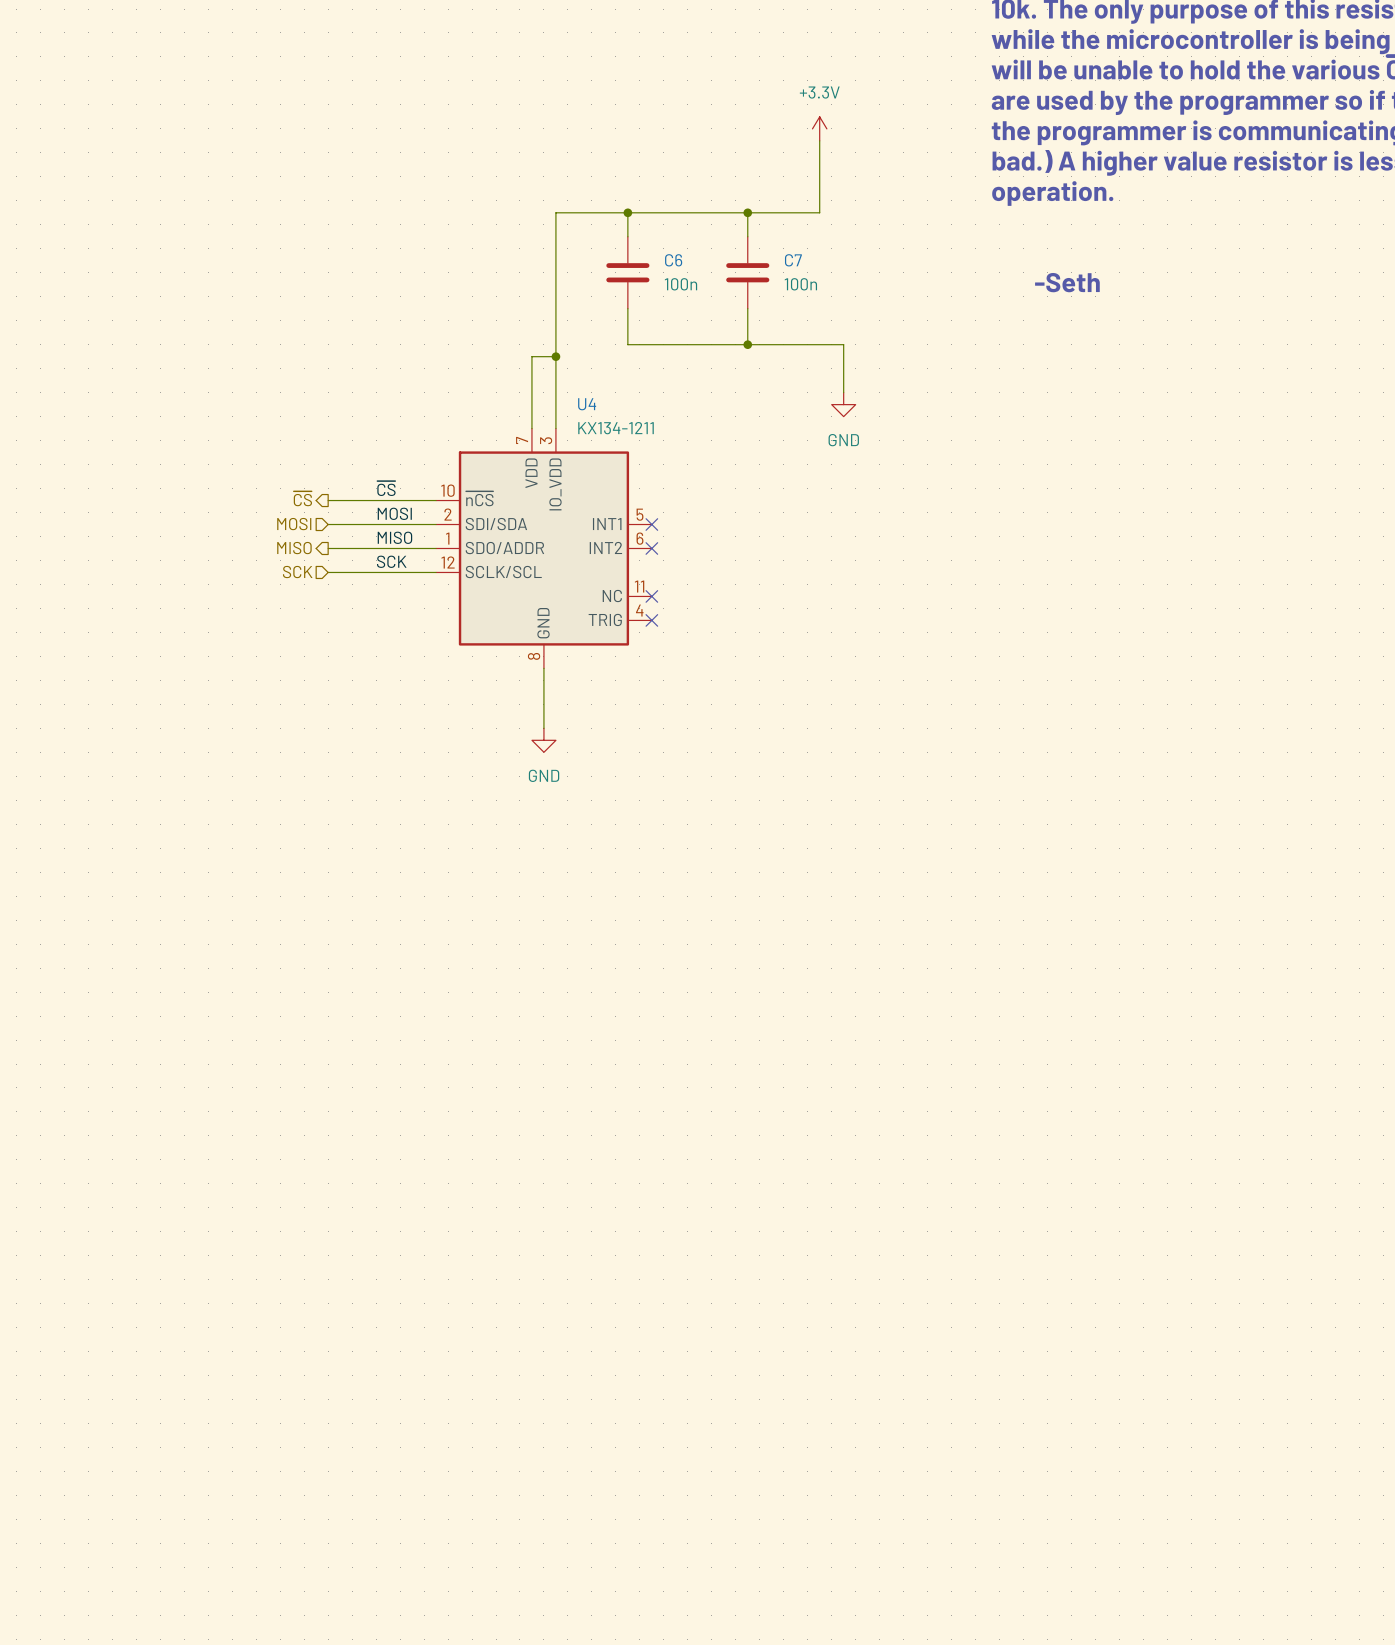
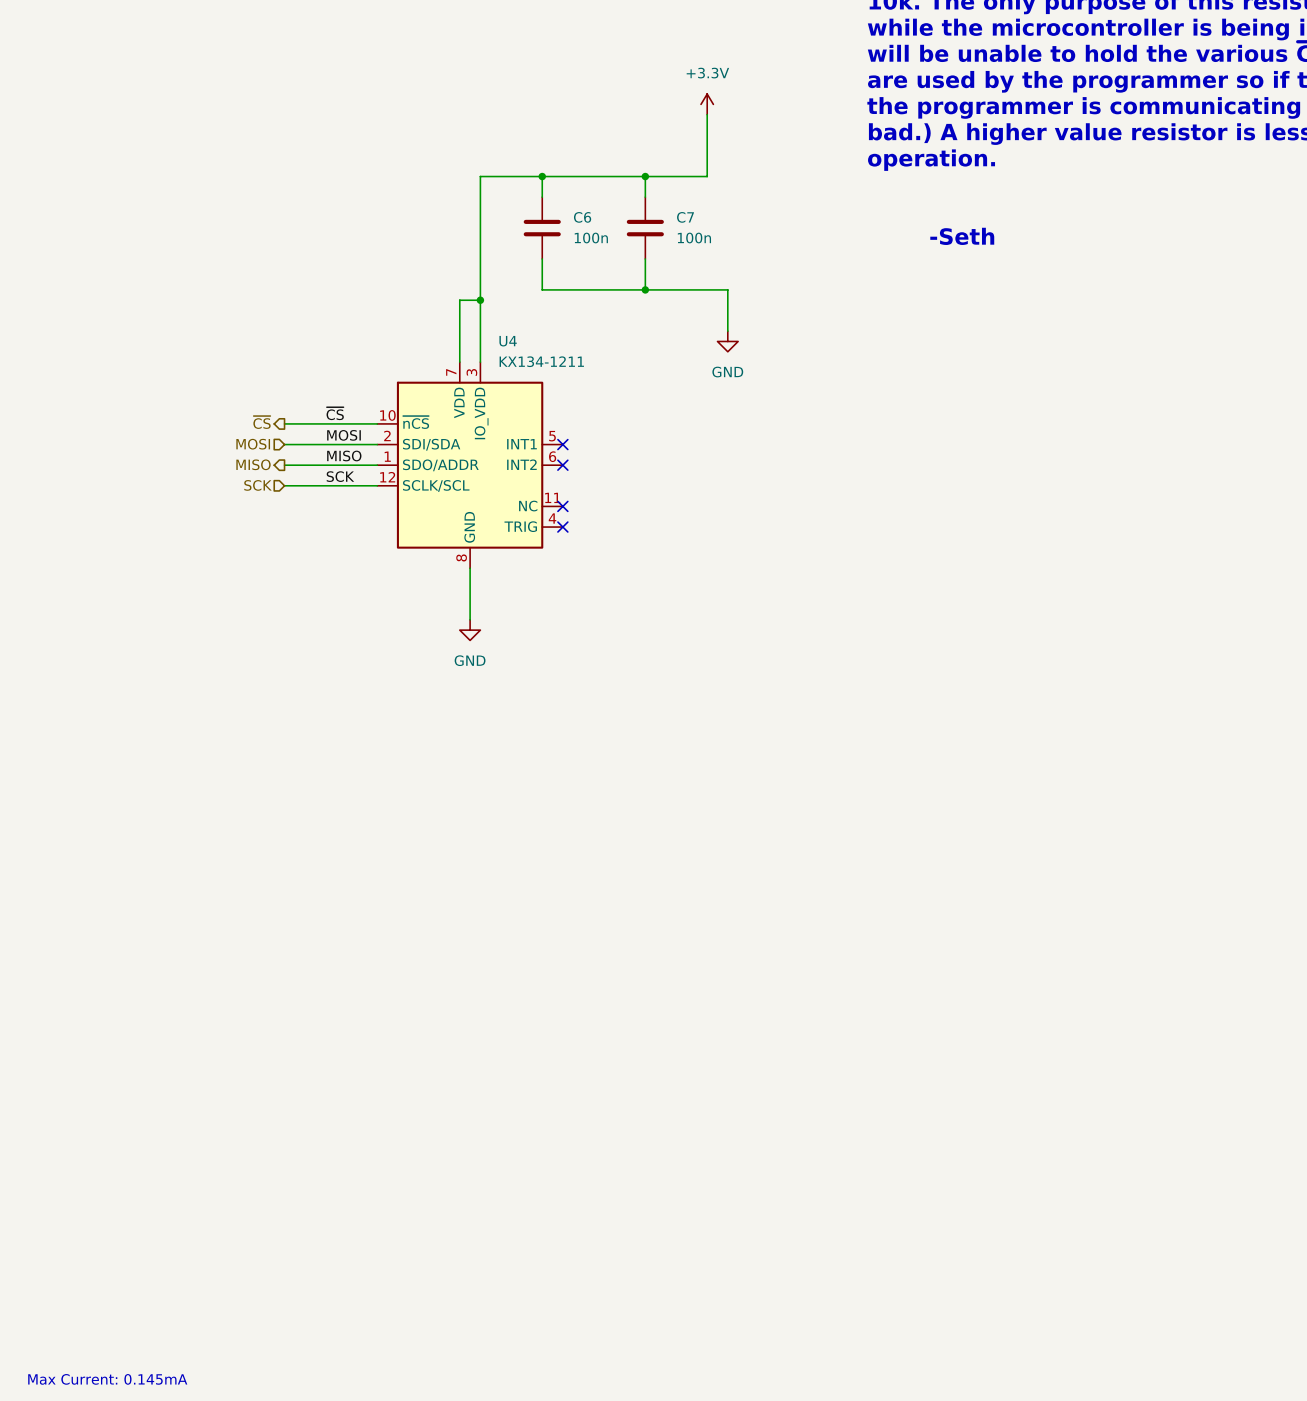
text: none -> Max Current: 0.145mA (107, 1379)

